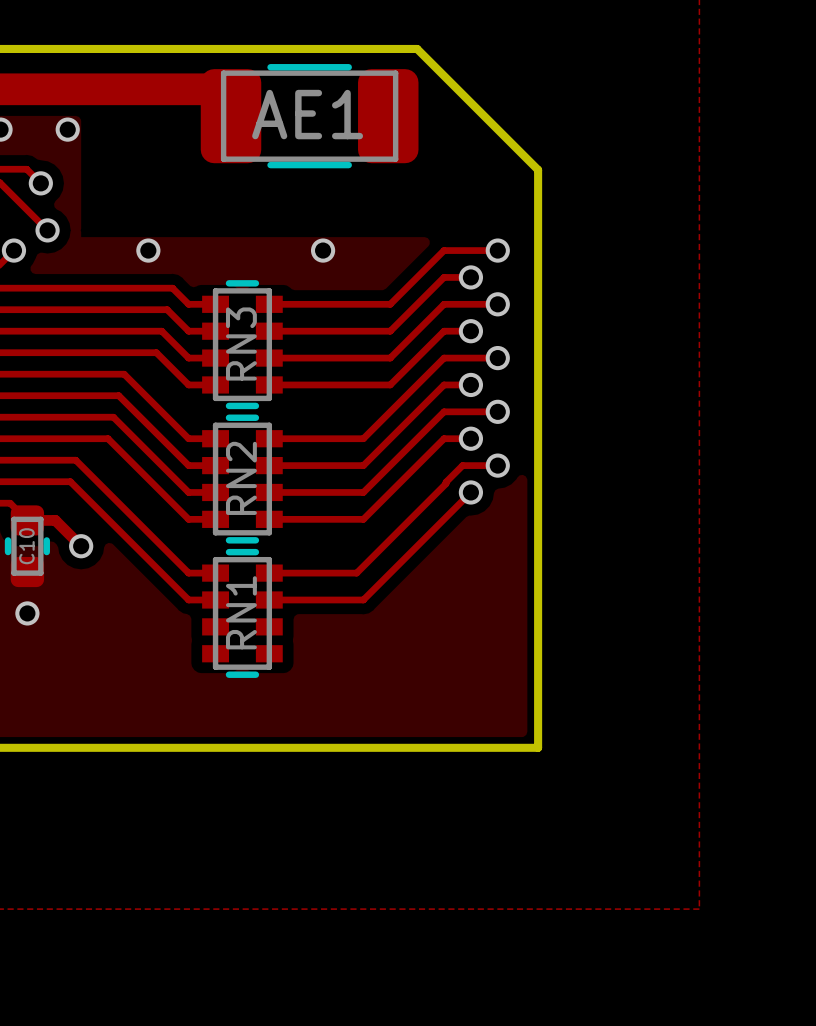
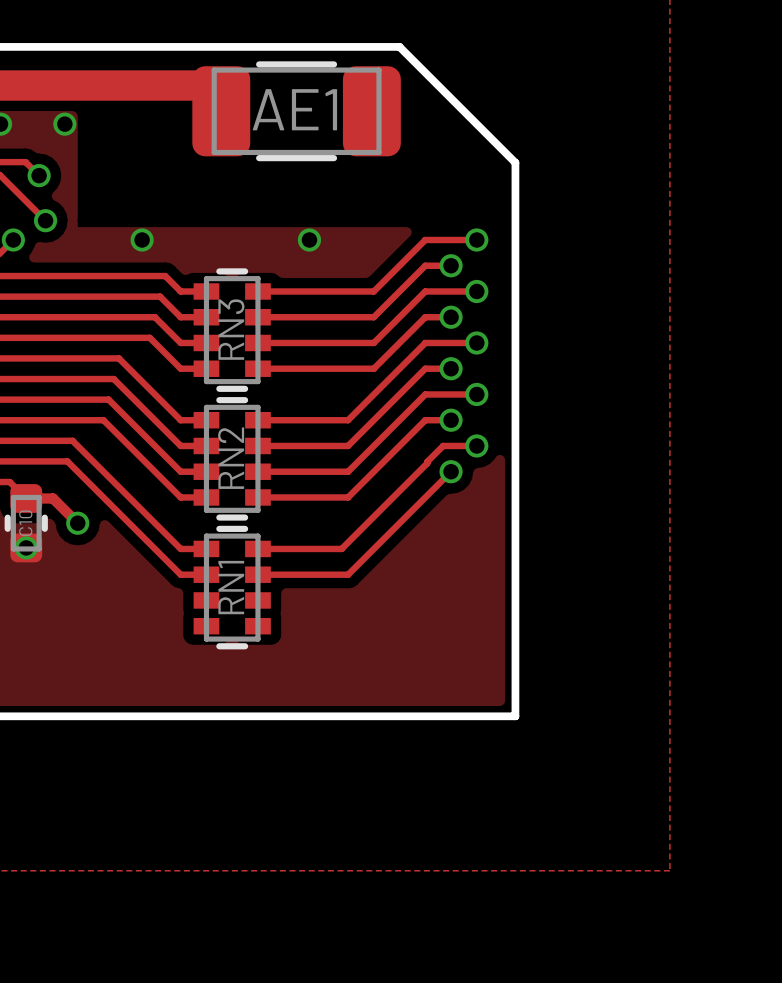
via position: (27, 613) -> (26, 547)

